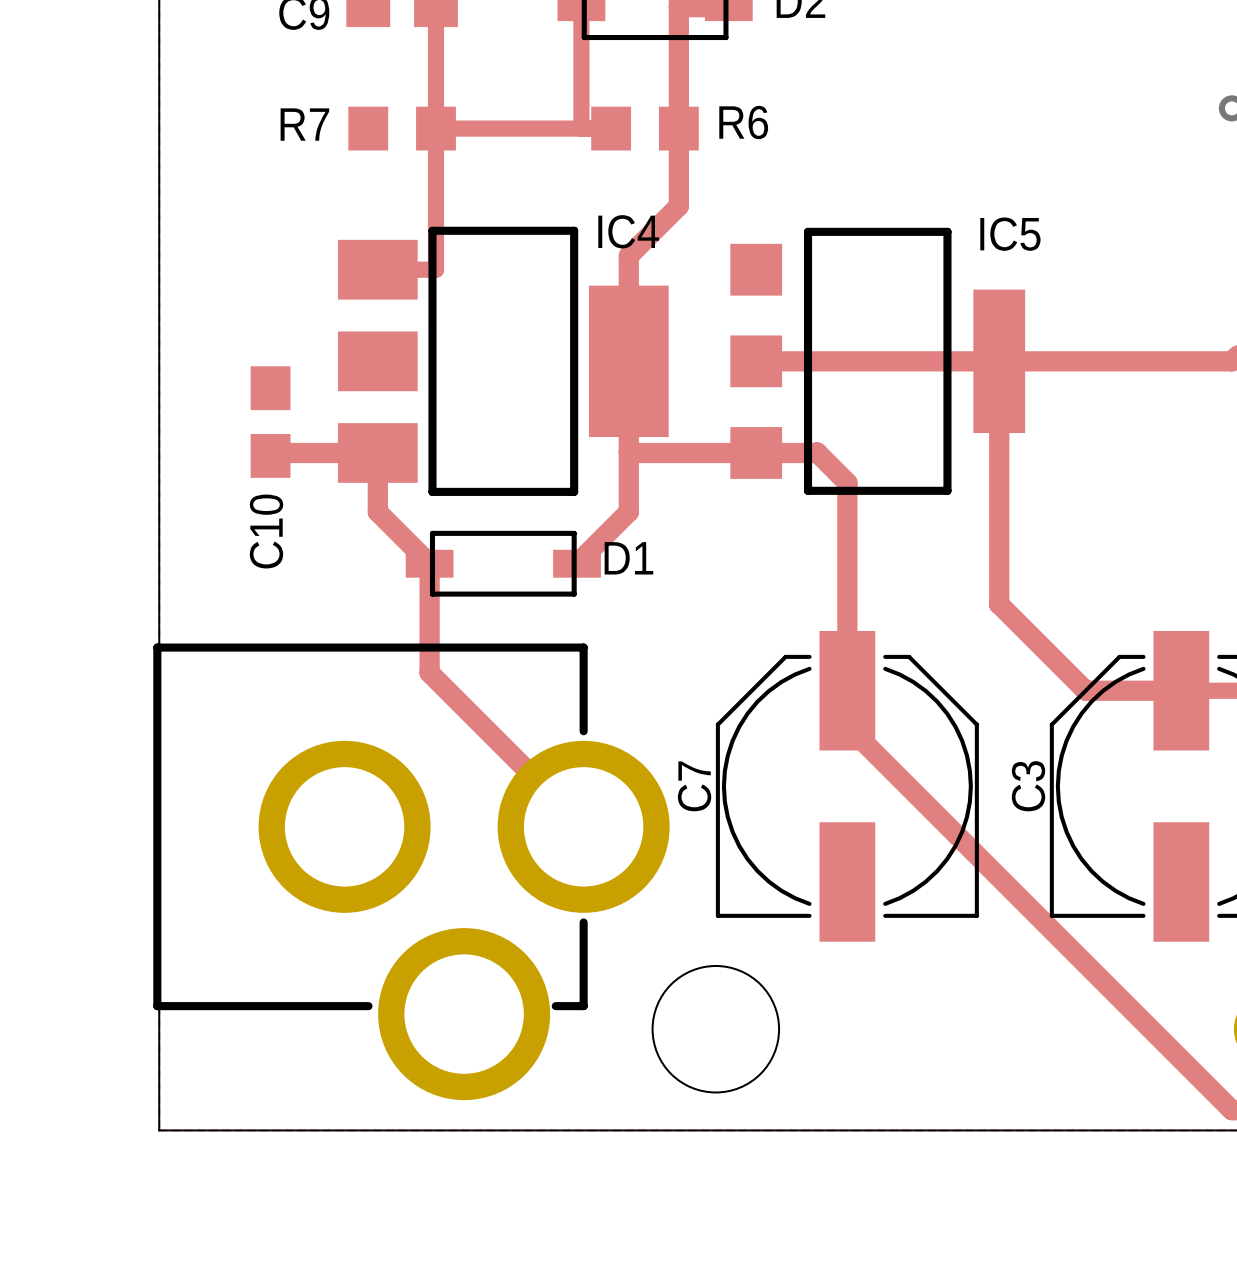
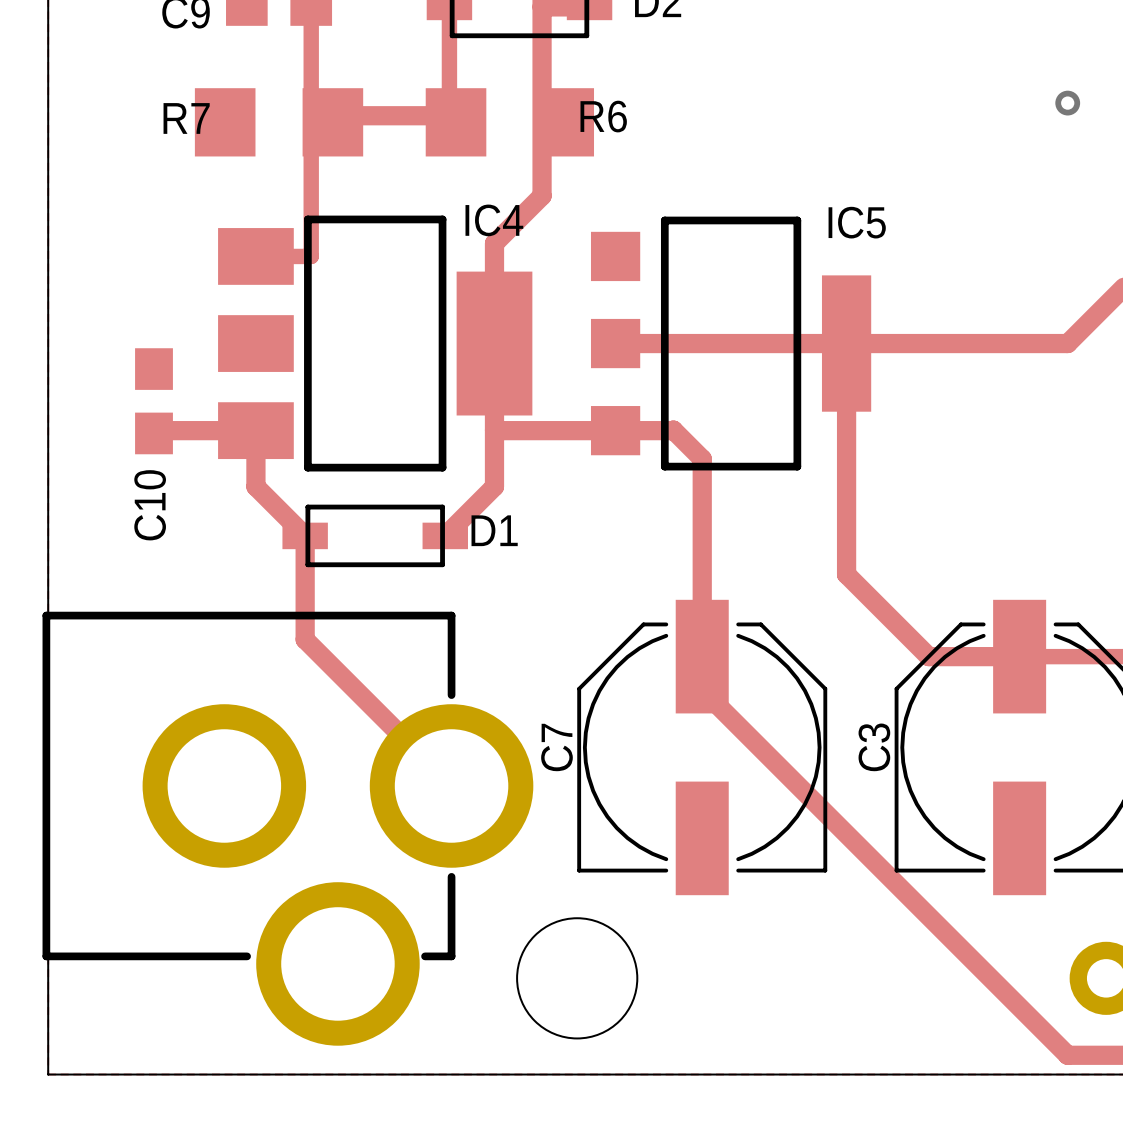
R7 footprint: [348, 106, 456, 151] -> [194, 88, 364, 157]
R6 footprint: [591, 106, 699, 151] -> [425, 88, 595, 157]
track: (435, 128) (611, 128) -> none
track: none -> (332, 122) (339, 115) (449, 115) (456, 122)

